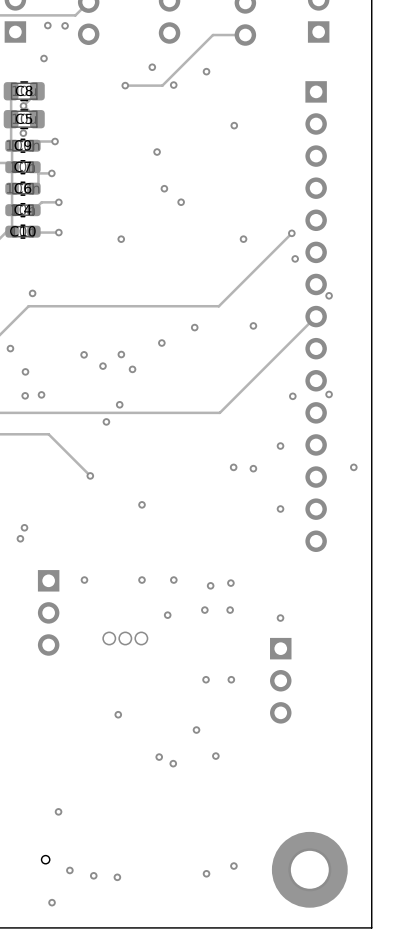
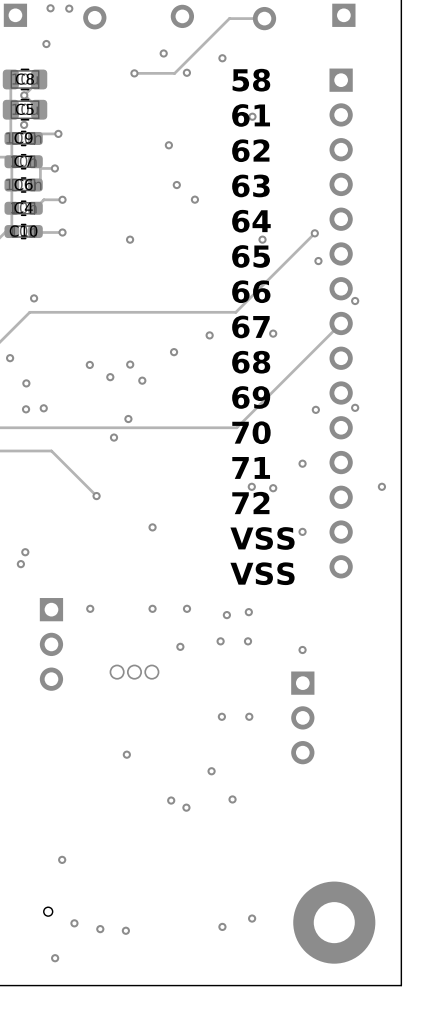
text: none -> 58 (251, 80)
text: none -> 61 (251, 115)
text: none -> 62 (250, 150)
text: none -> 63 (250, 185)
text: none -> 64 (251, 221)
text: none -> 65 (251, 256)
text: none -> 66 (251, 291)
text: none -> 67 (250, 326)
text: none -> 68 (251, 362)
text: none -> 69 (251, 397)
text: none -> 70 (251, 432)
text: none -> 71 (251, 467)
text: none -> 72 (250, 503)
text: none -> VSS (262, 538)
text: none -> VSS (262, 573)

